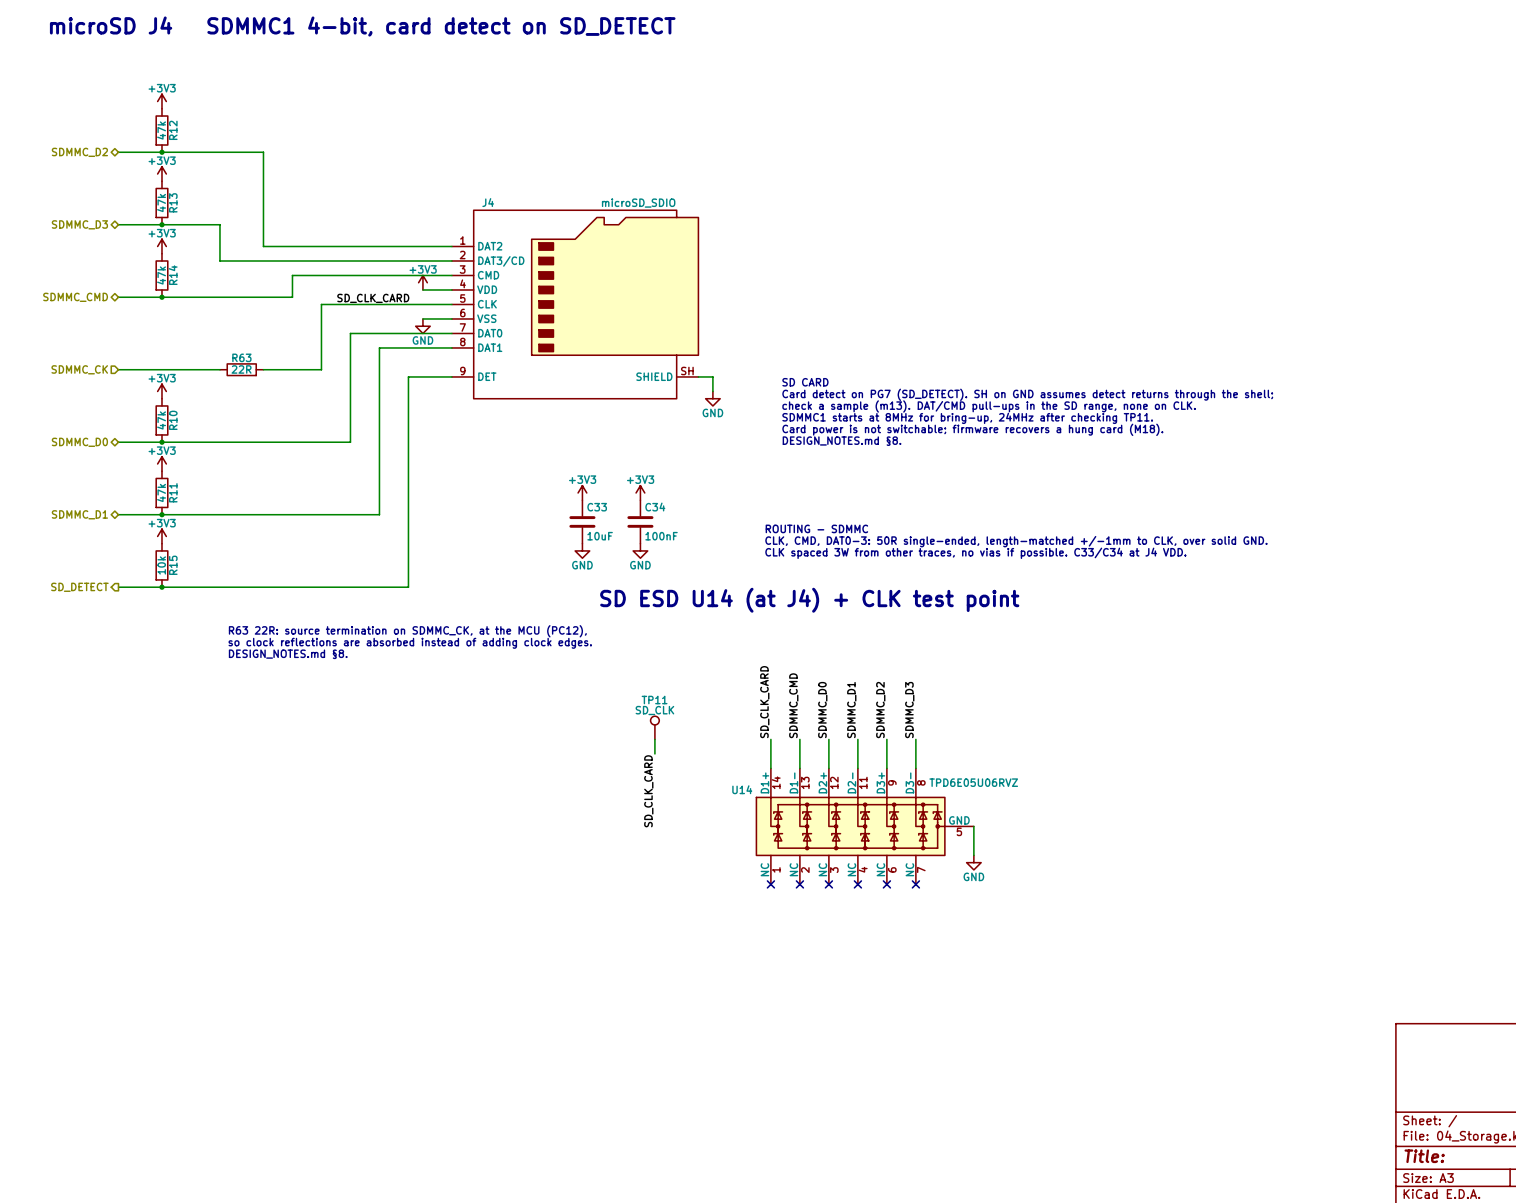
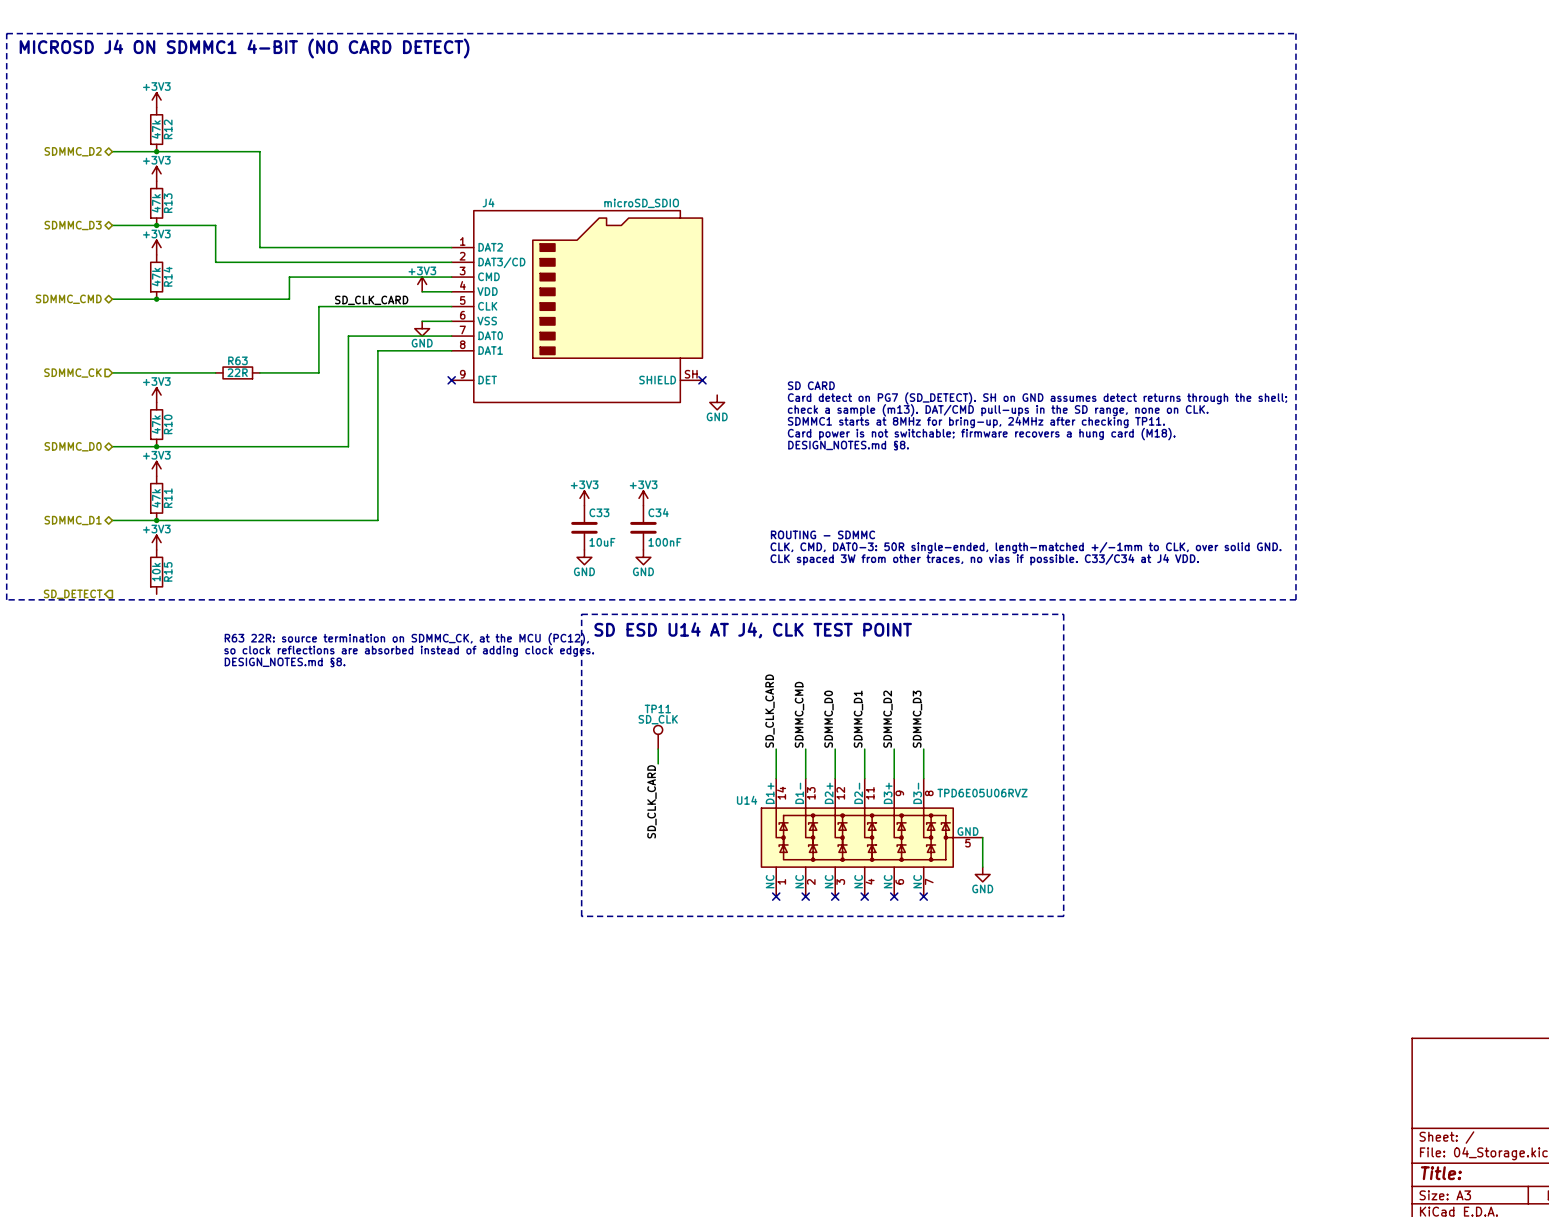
text: microSD J4 SDMMC1 4-bit, card detect on SD_DETECT (362, 26) -> none
line: none -> (6, 33) (1295, 33) (1295, 599) (6, 599) (6, 33)
text: none -> MICROSD J4 ON SDMMC1 4-BIT (NO CARD DETECT) (244, 48)
wire: (451, 376) (408, 376) (408, 587) (118, 587) -> none
no-connect mark: none -> (451, 380)
wire: (698, 376) (712, 376) (712, 391) -> none
no-connect mark: none -> (702, 380)
junction: (161, 587) -> none
text: SD ESD U14 (at J4) + CLK test point (809, 600) -> none
line: none -> (581, 614) (1063, 614) (1063, 916) (581, 916) (581, 614)
text: none -> SD ESD U14 AT J4, CLK TEST POINT (753, 630)

